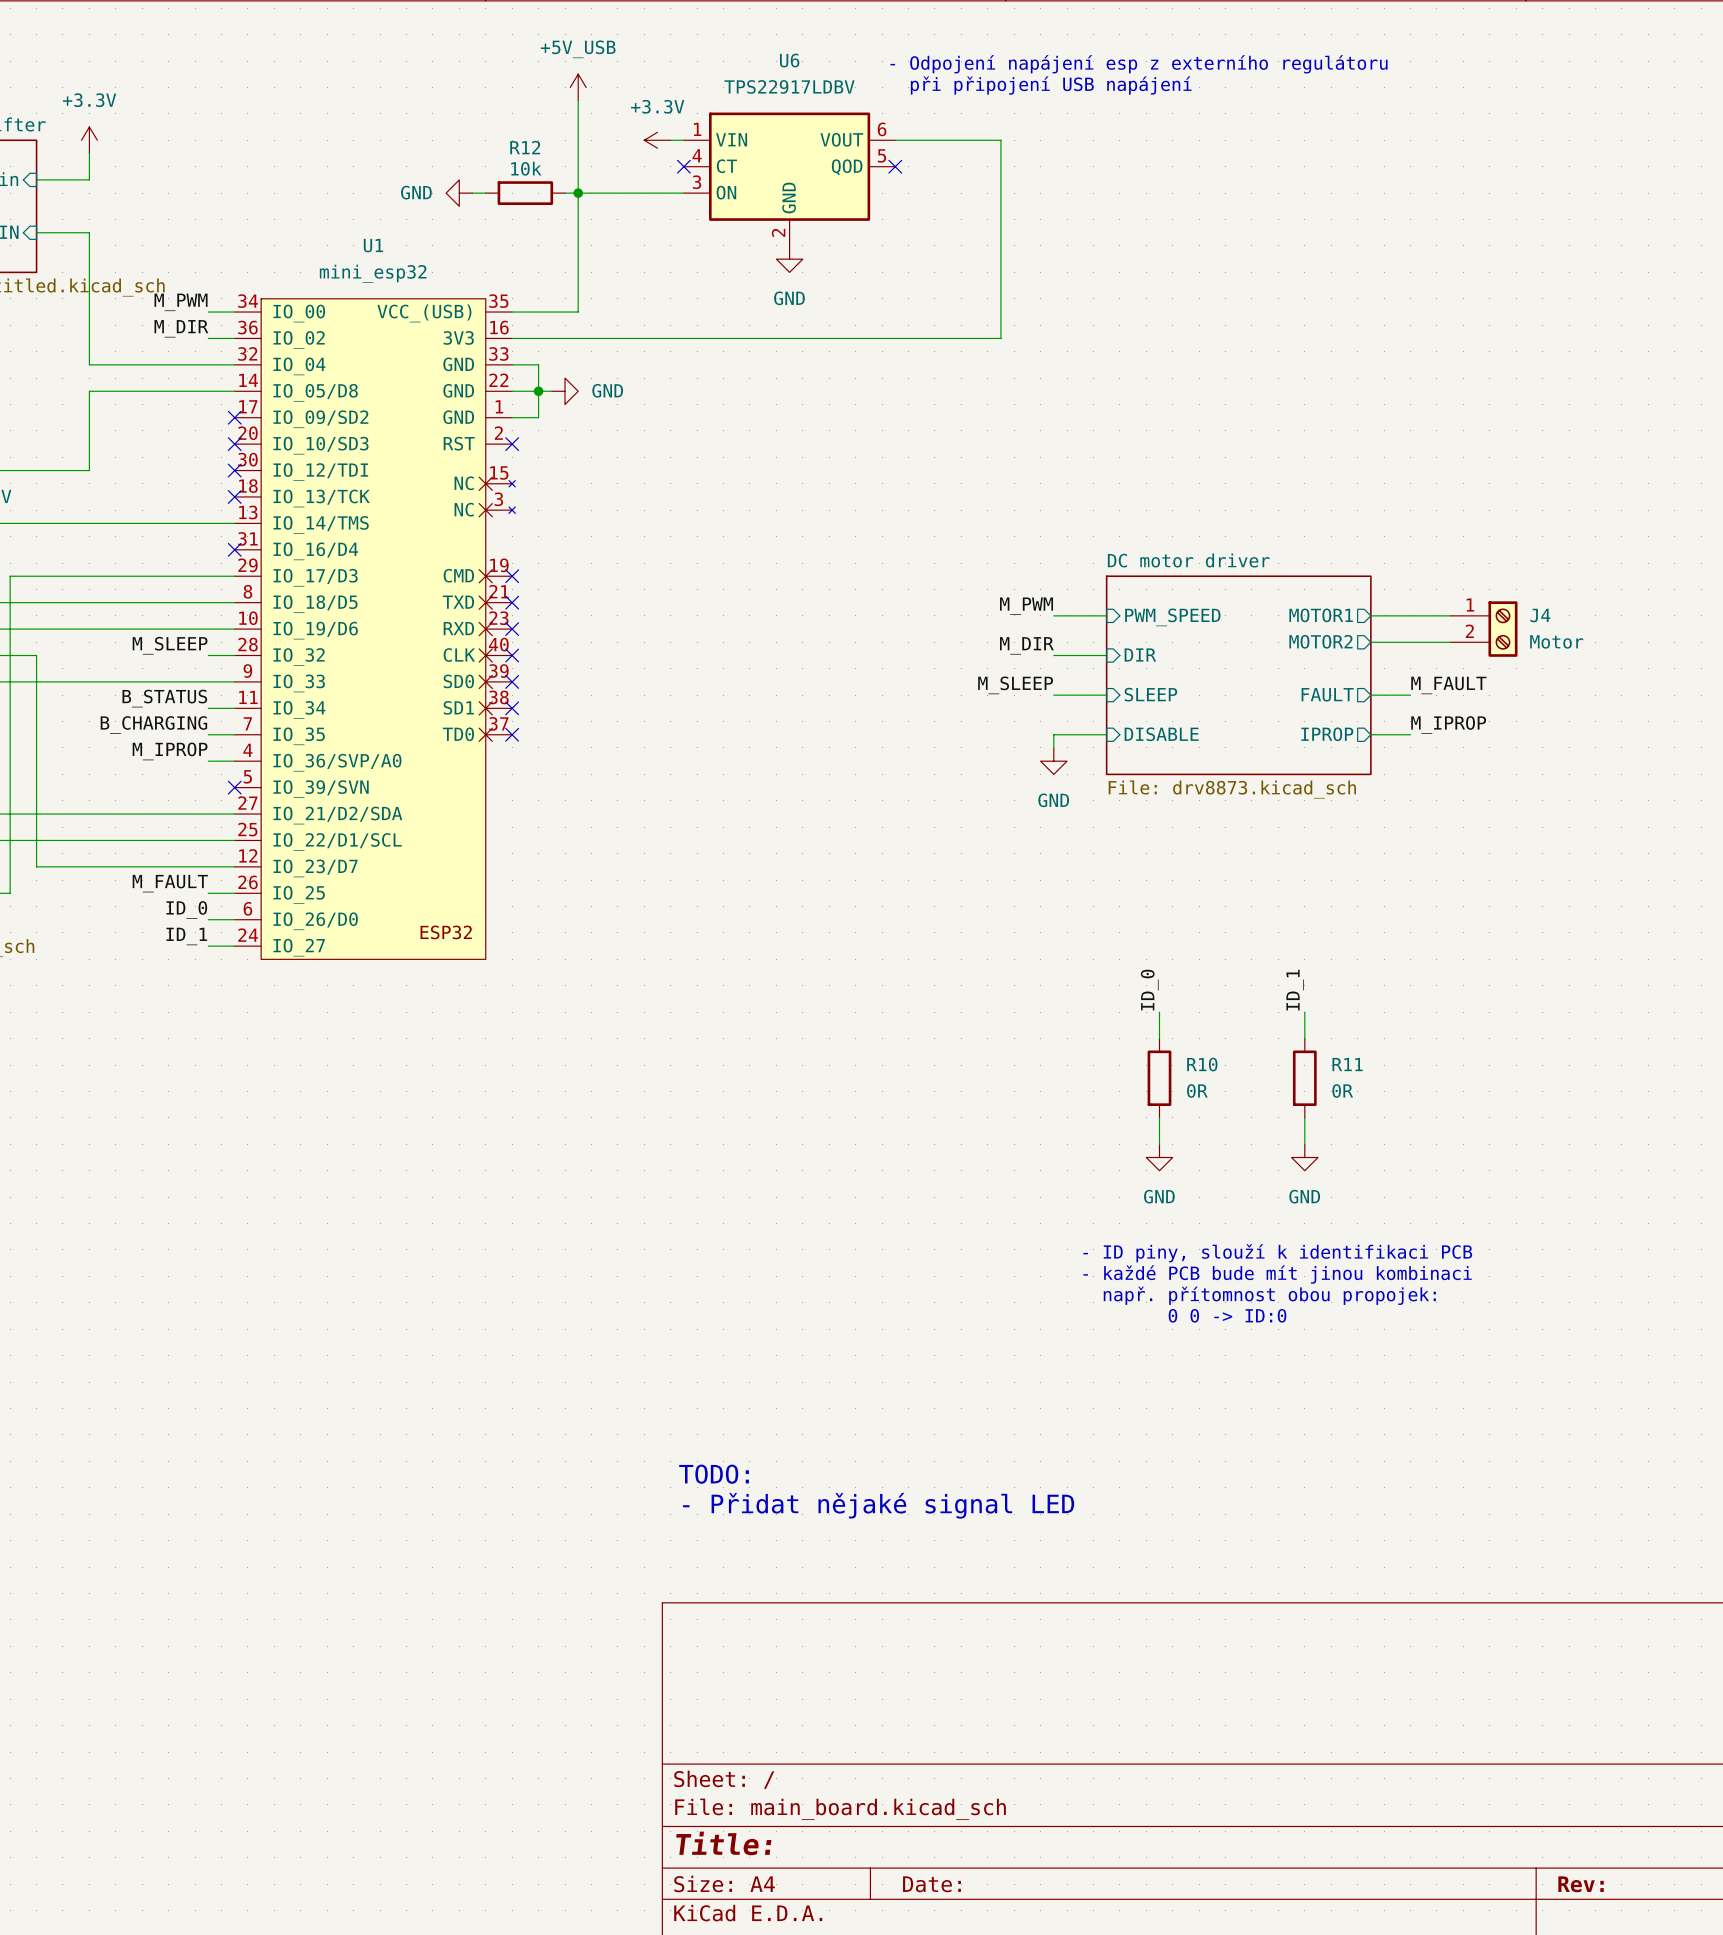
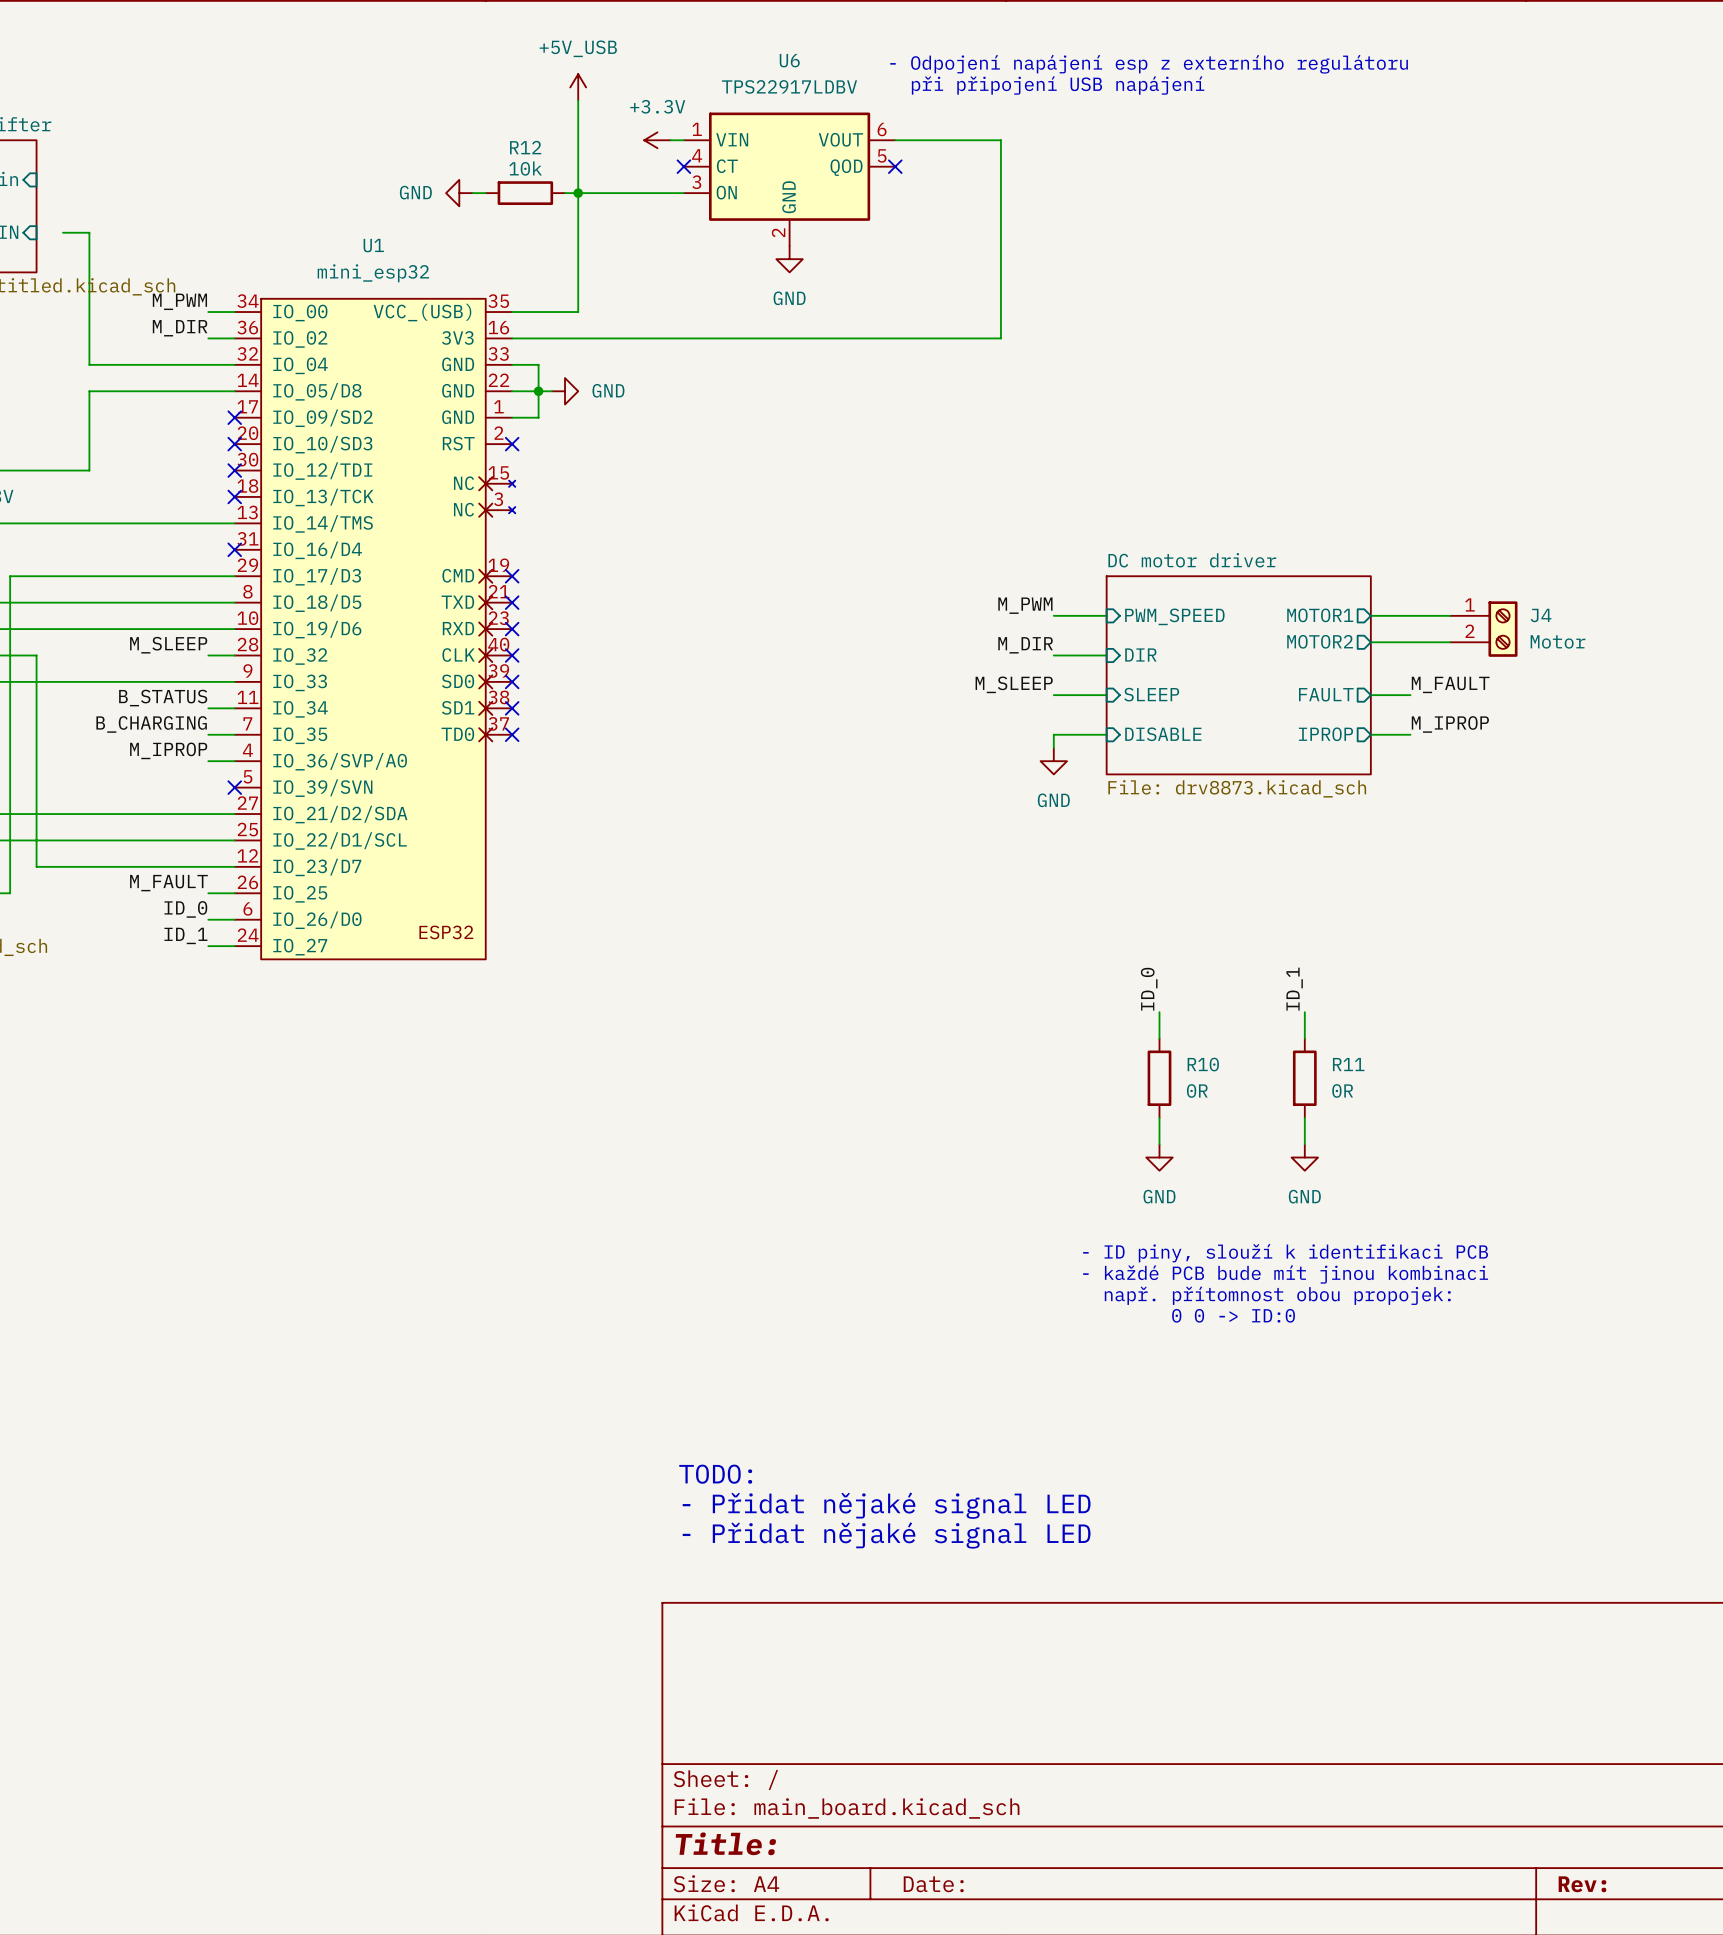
power symbol: +3.3V (89, 140) -> none
wire: (89, 153) (89, 179) (36, 179) -> none
wire: (36, 232) (62, 232) -> none
text: none -> - Přidat nějaké signal LED (886, 1535)

